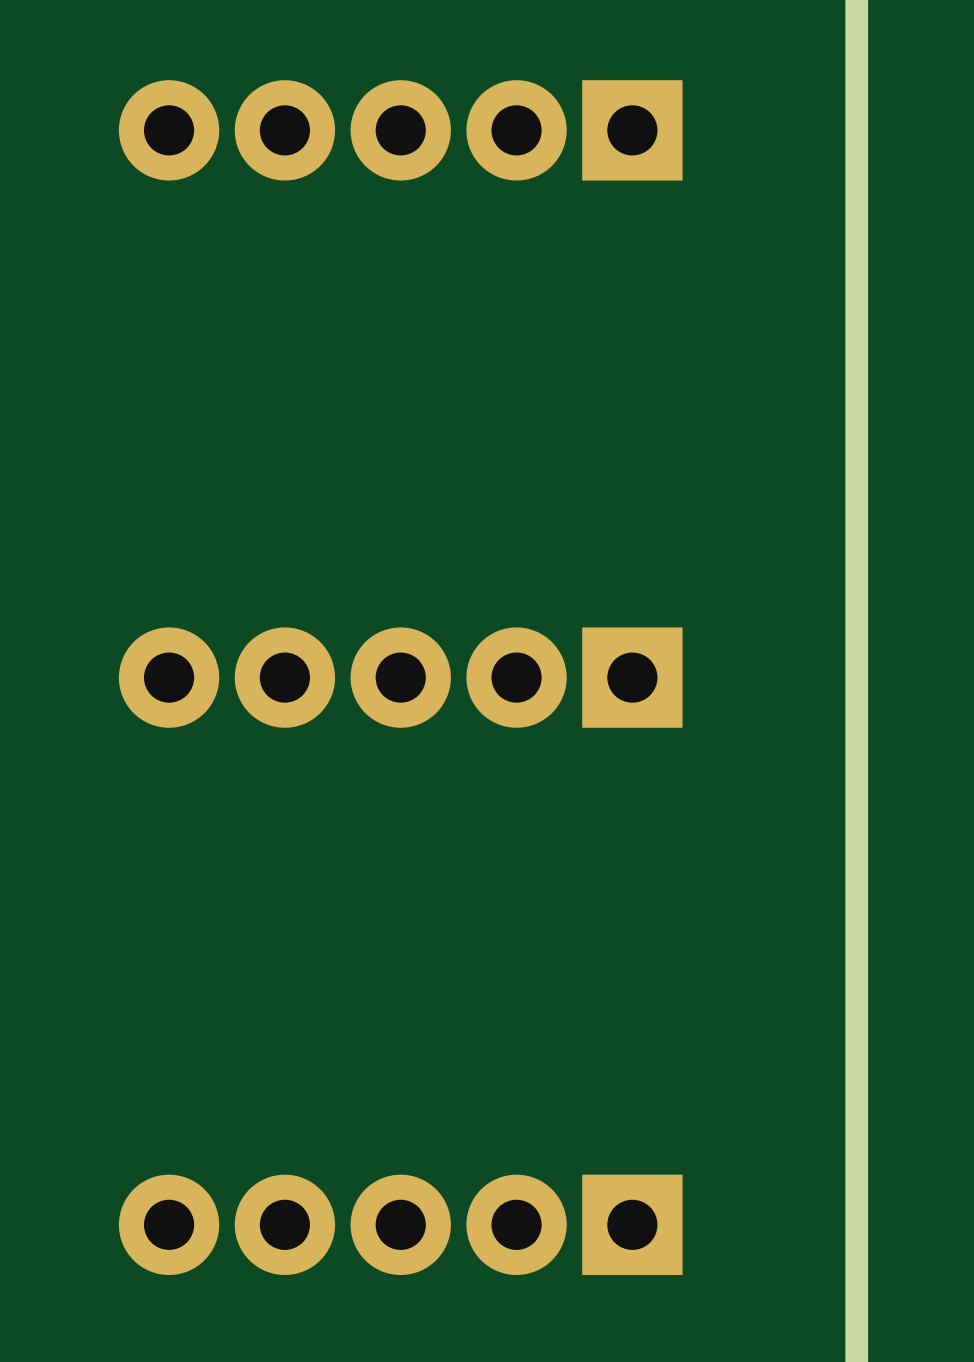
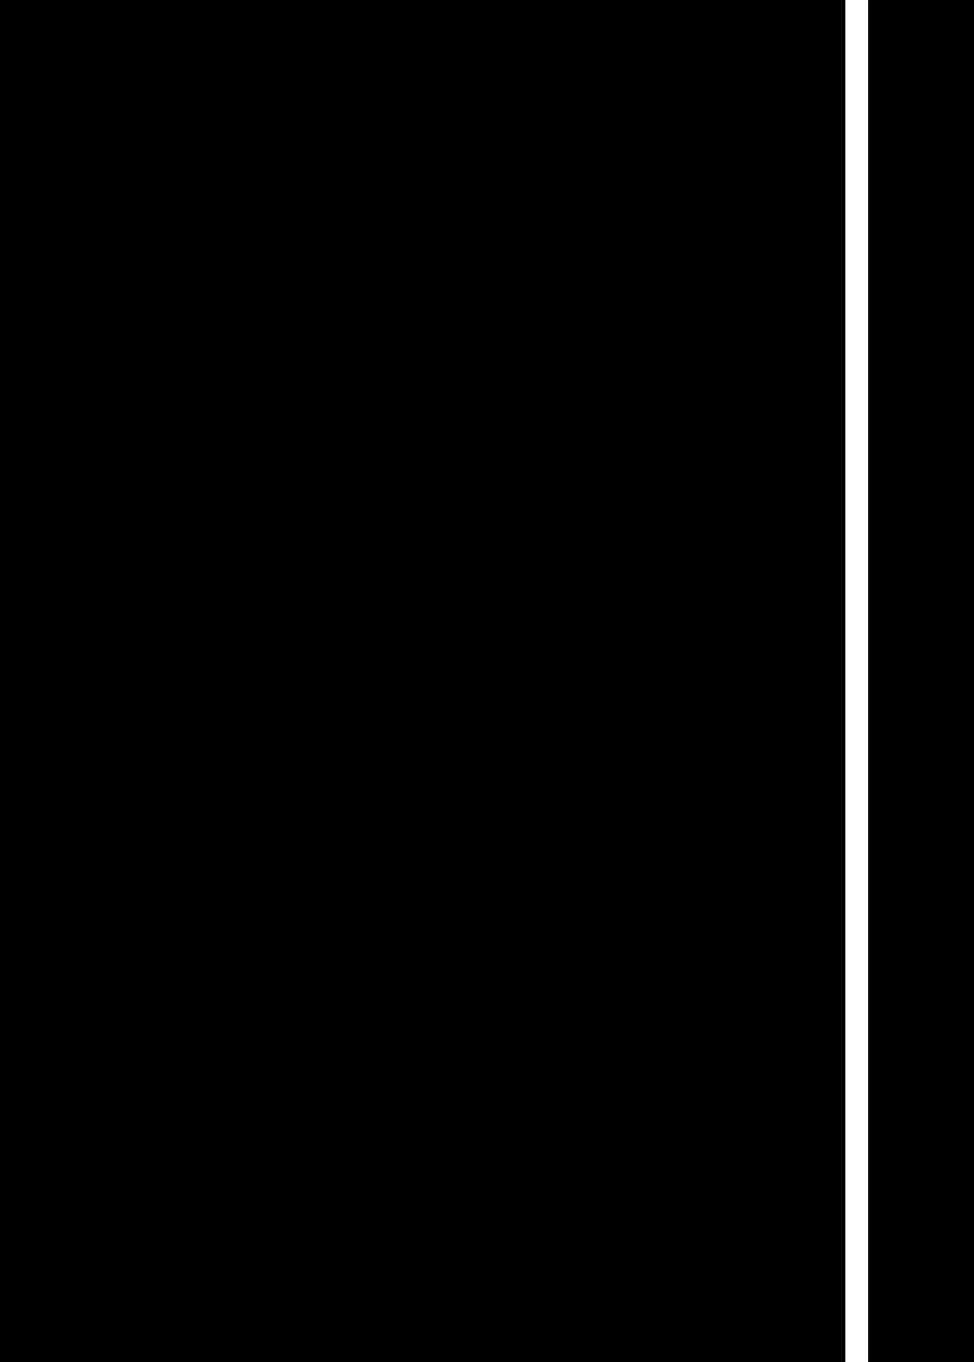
part: (400, 130) -> none
part: (400, 677) -> none
part: (400, 1224) -> none

